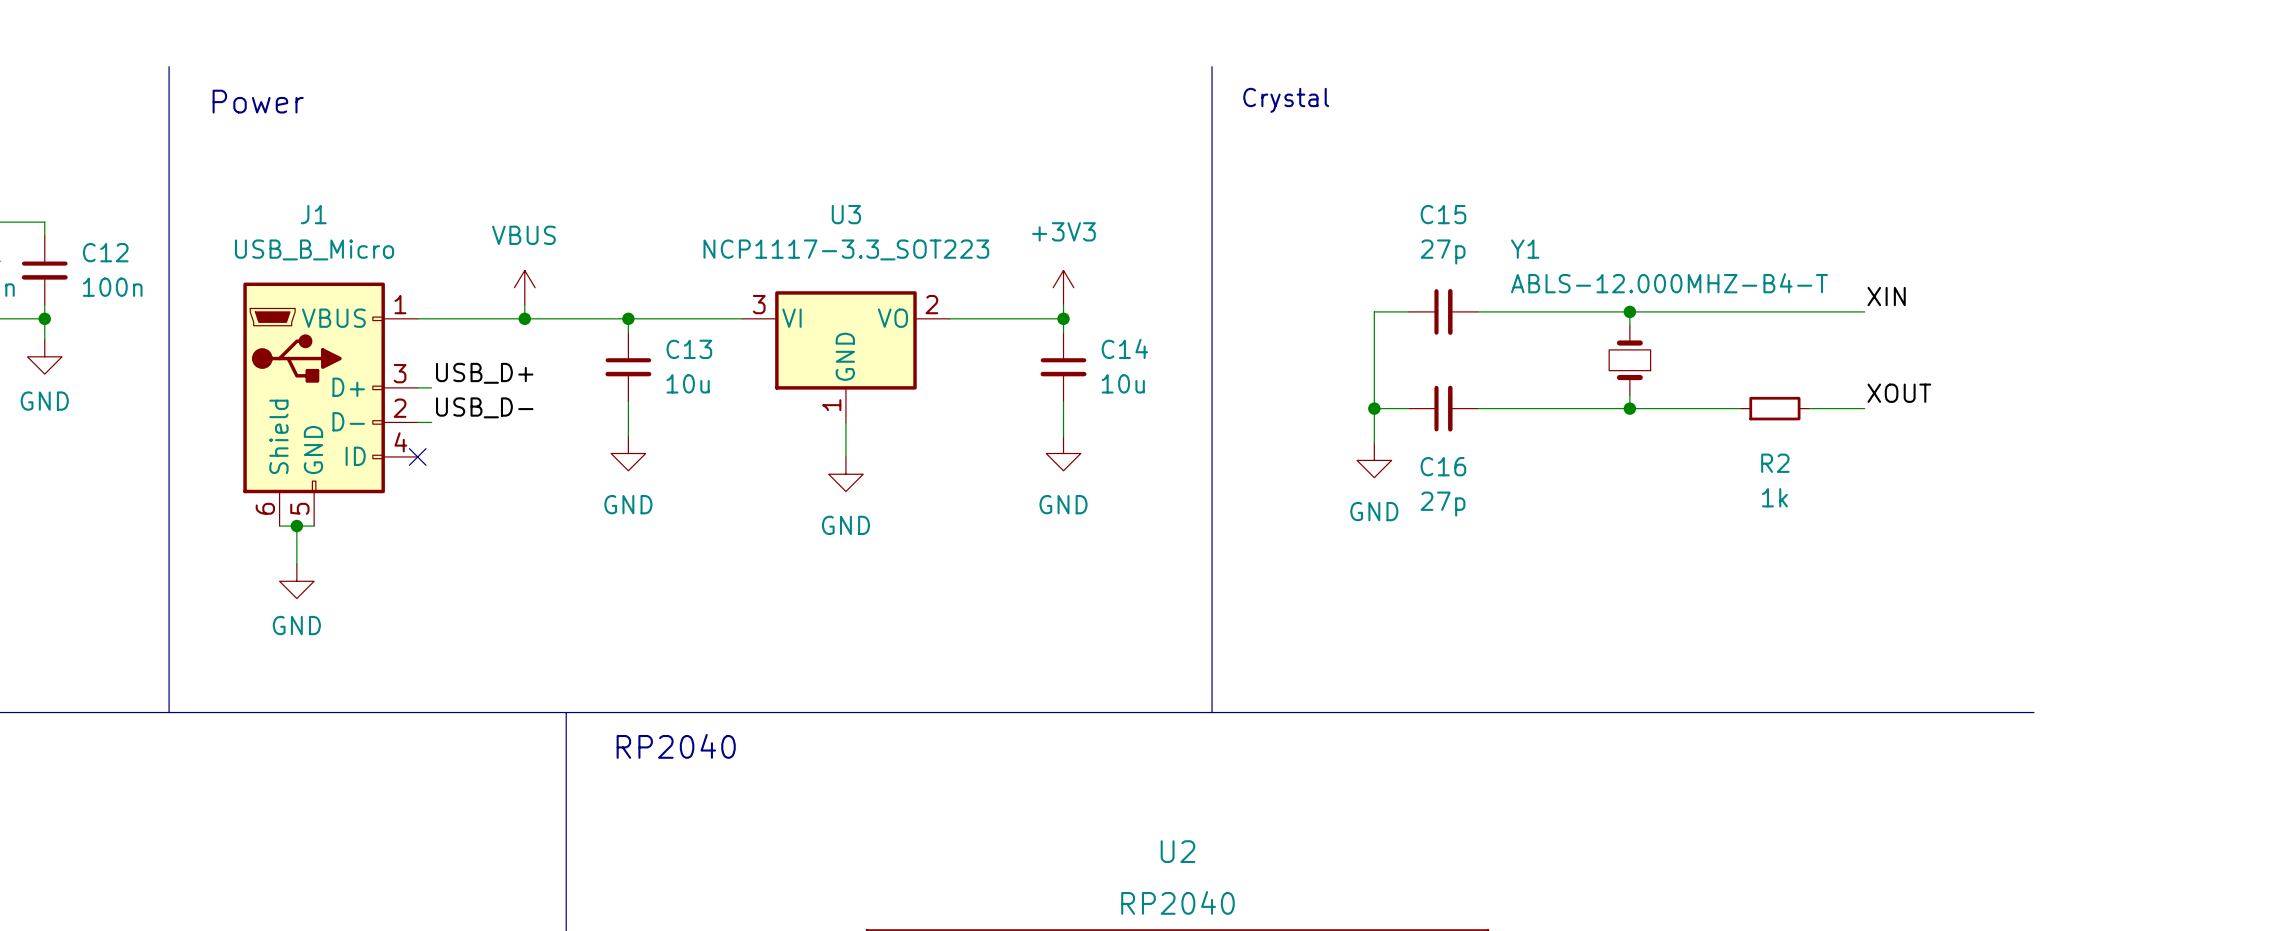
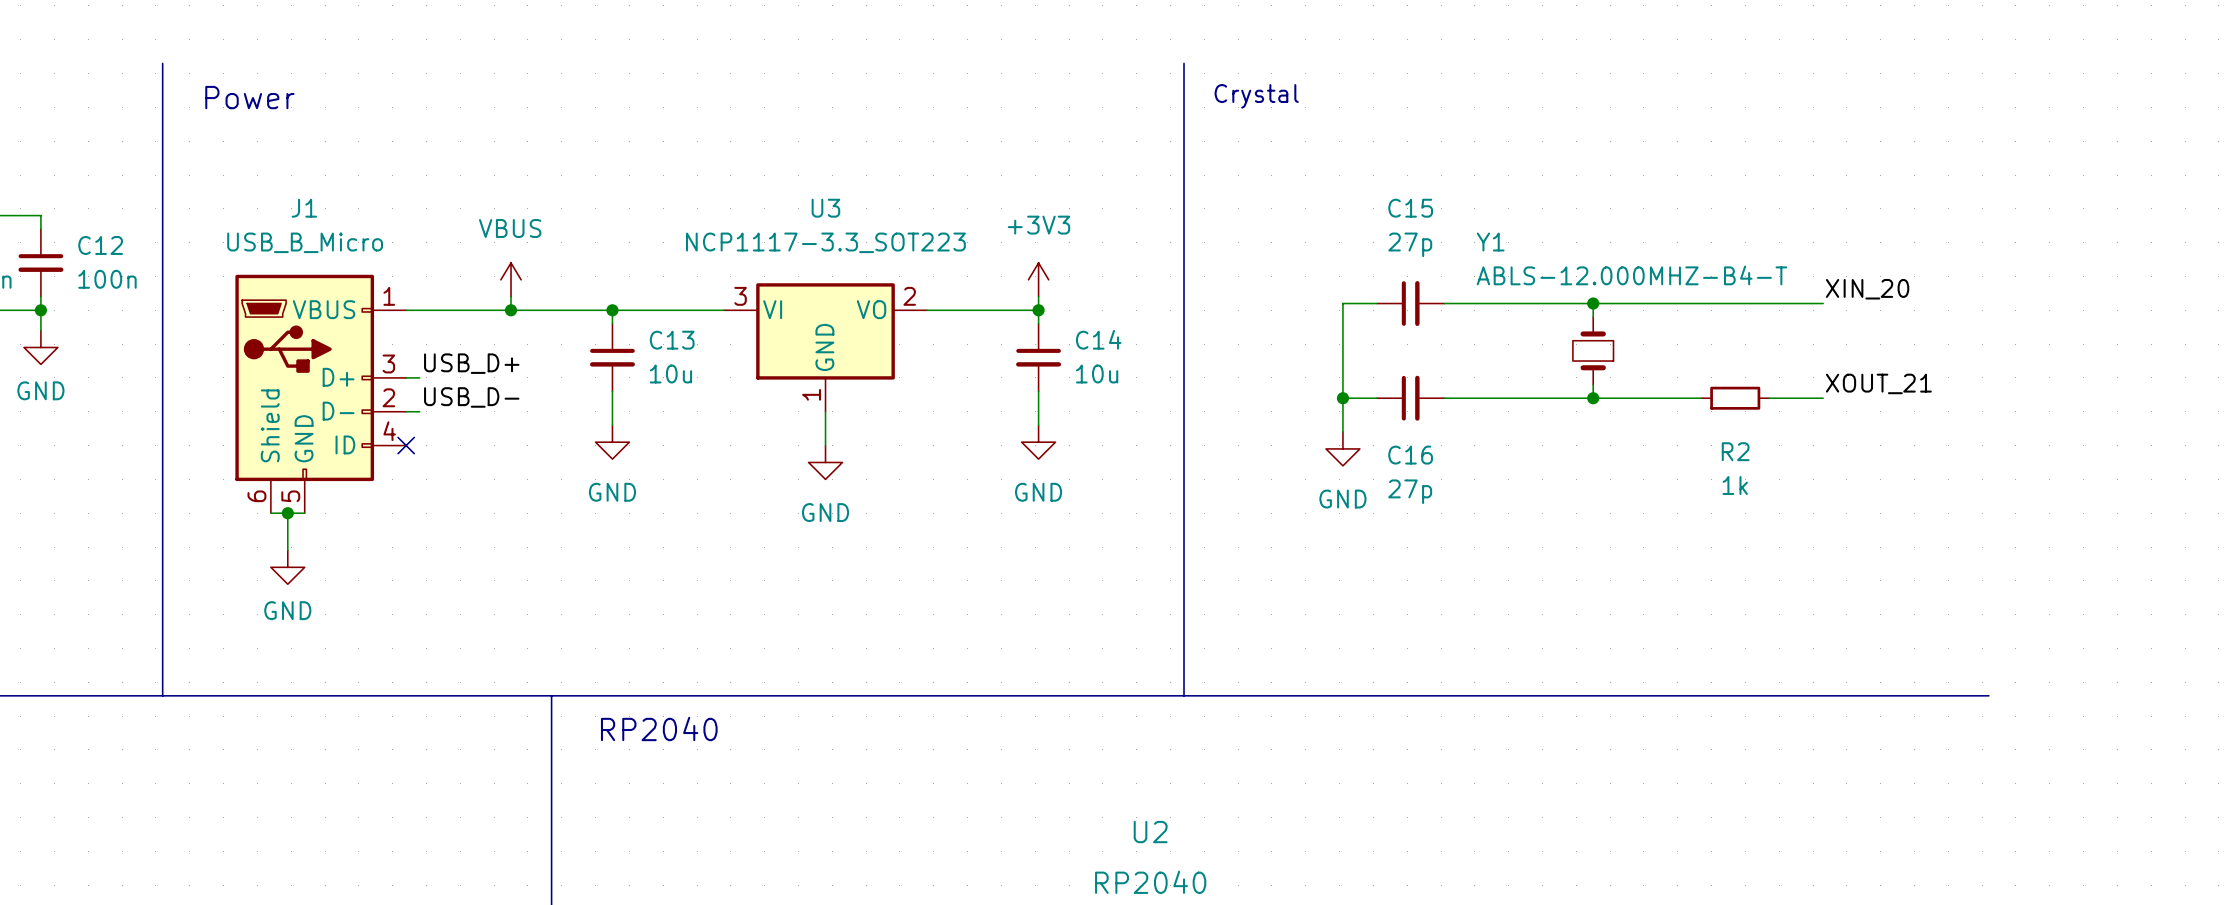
label: XIN (1886, 296) -> XIN_20 (1867, 289)
label: XOUT (1899, 393) -> XOUT_21 (1878, 383)

